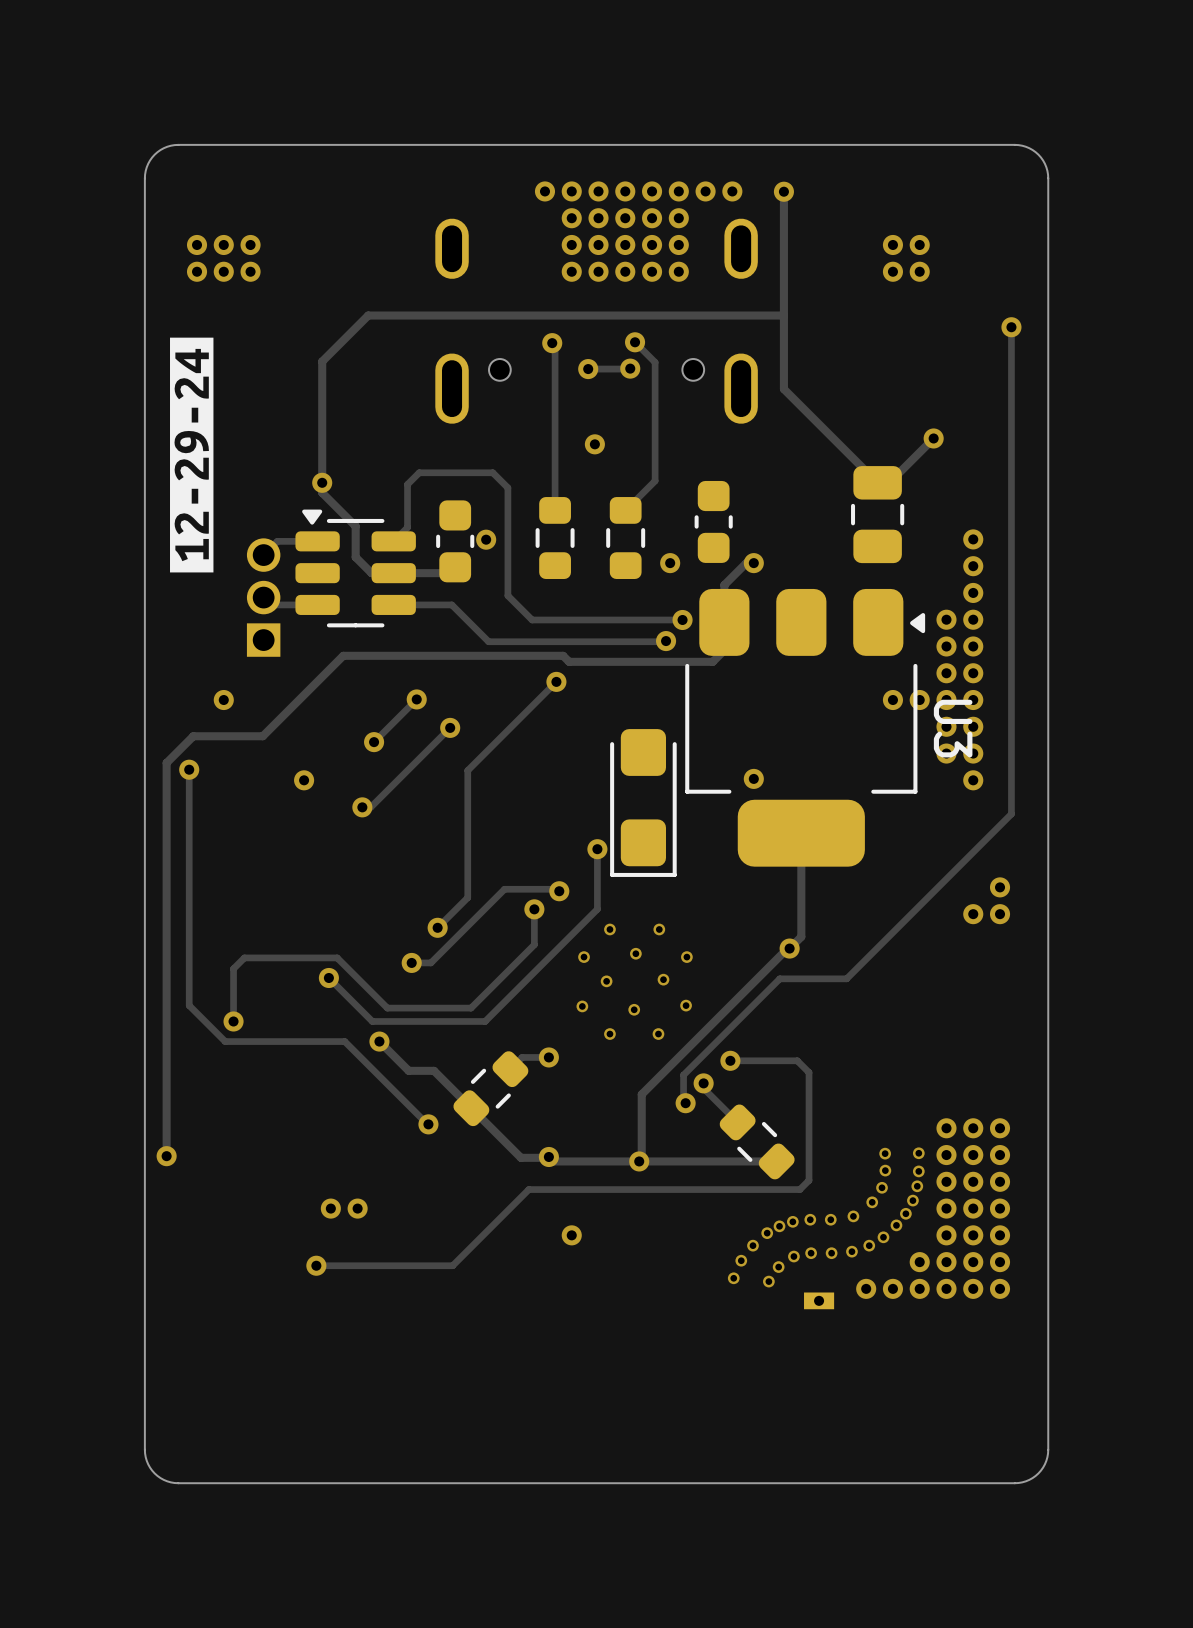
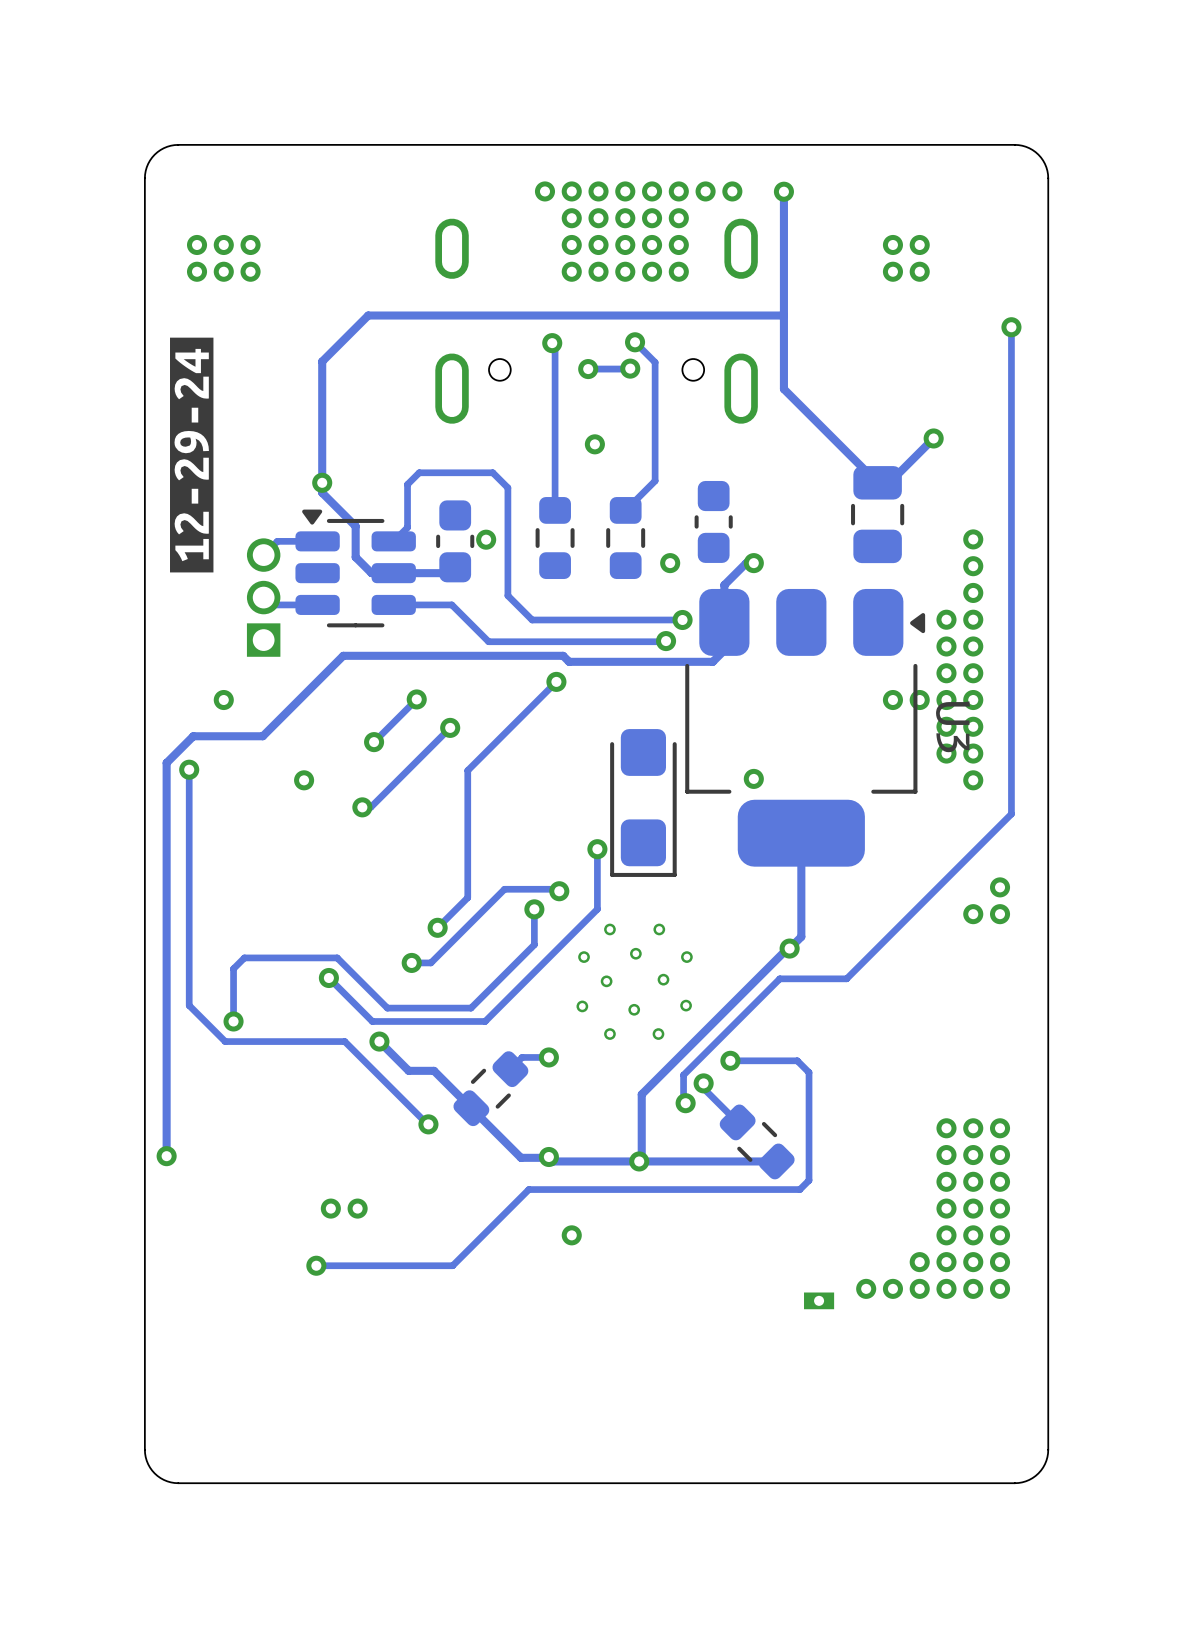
via: (885, 1153) -> none
via: (918, 1153) -> none
via: (885, 1170) -> none
via: (918, 1171) -> none
via: (917, 1186) -> none
via: (882, 1187) -> none
via: (912, 1200) -> none
via: (872, 1202) -> none
via: (905, 1213) -> none
via: (853, 1216) -> none
via: (810, 1219) -> none
via: (830, 1219) -> none
via: (792, 1221) -> none
via: (896, 1225) -> none
via: (779, 1226) -> none
via: (767, 1233) -> none
via: (883, 1237) -> none
via: (752, 1245) -> none
via: (869, 1245) -> none
via: (851, 1251) -> none
via: (811, 1253) -> none
via: (831, 1253) -> none
via: (793, 1256) -> none
via: (741, 1260) -> none
via: (778, 1267) -> none
via: (733, 1278) -> none
via: (768, 1281) -> none

